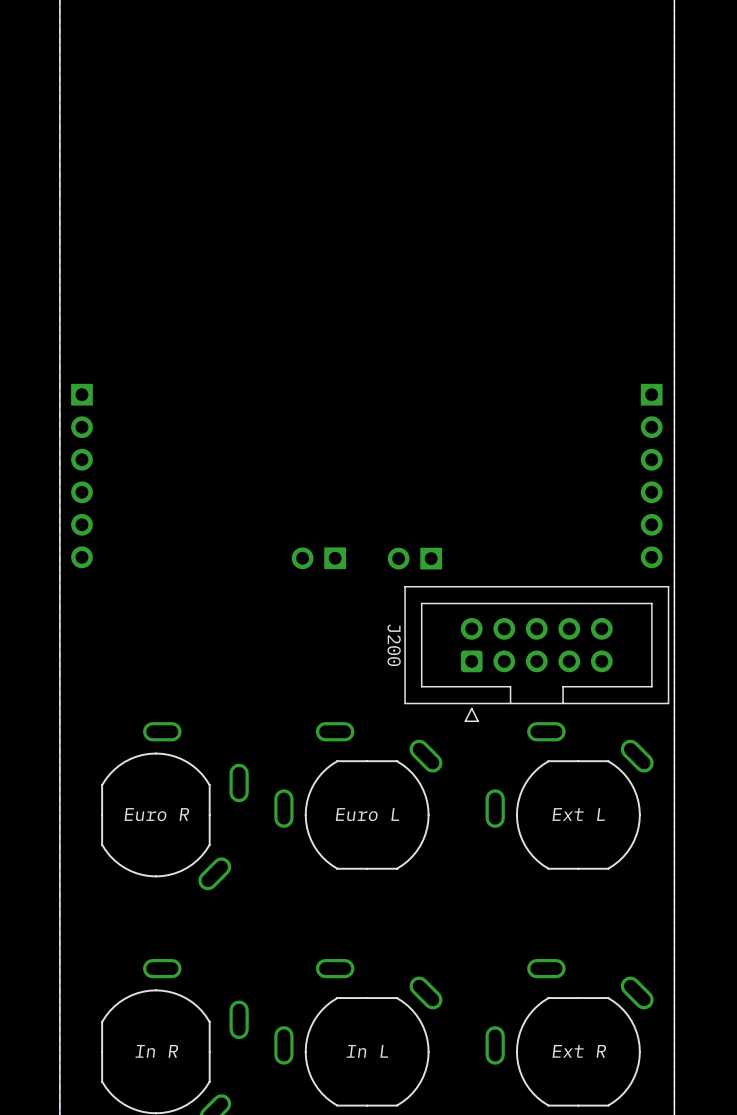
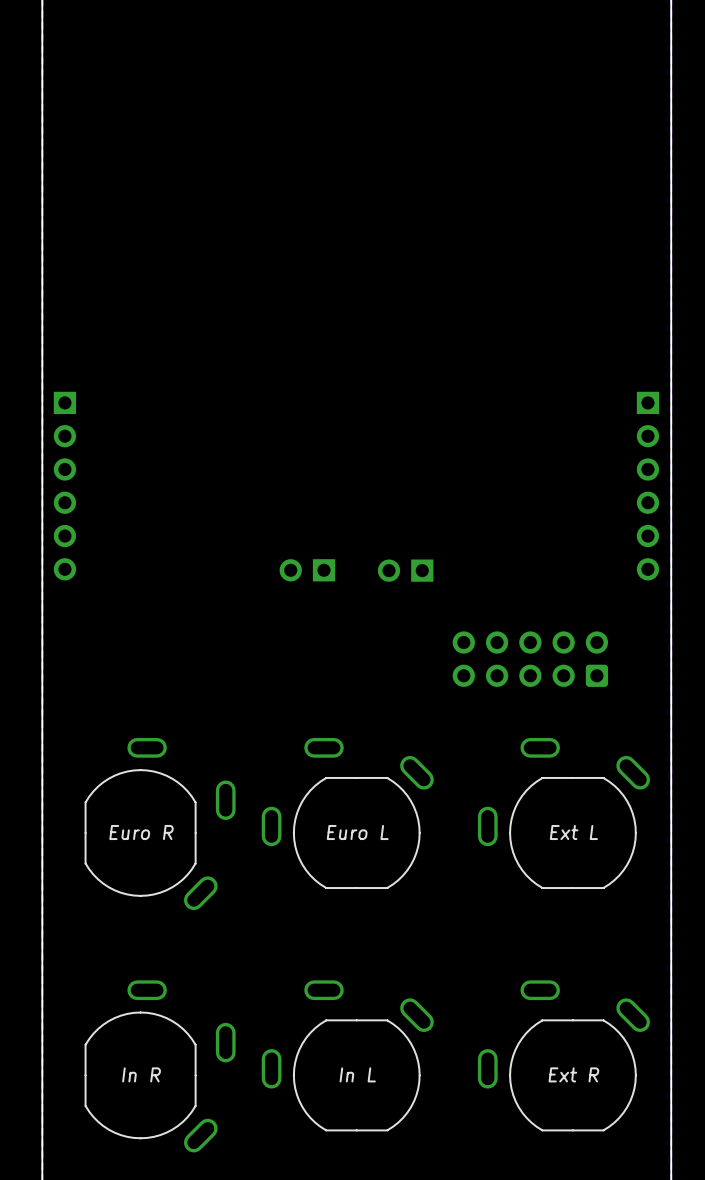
J200 side: bottom (536, 654) -> top (530, 659)

